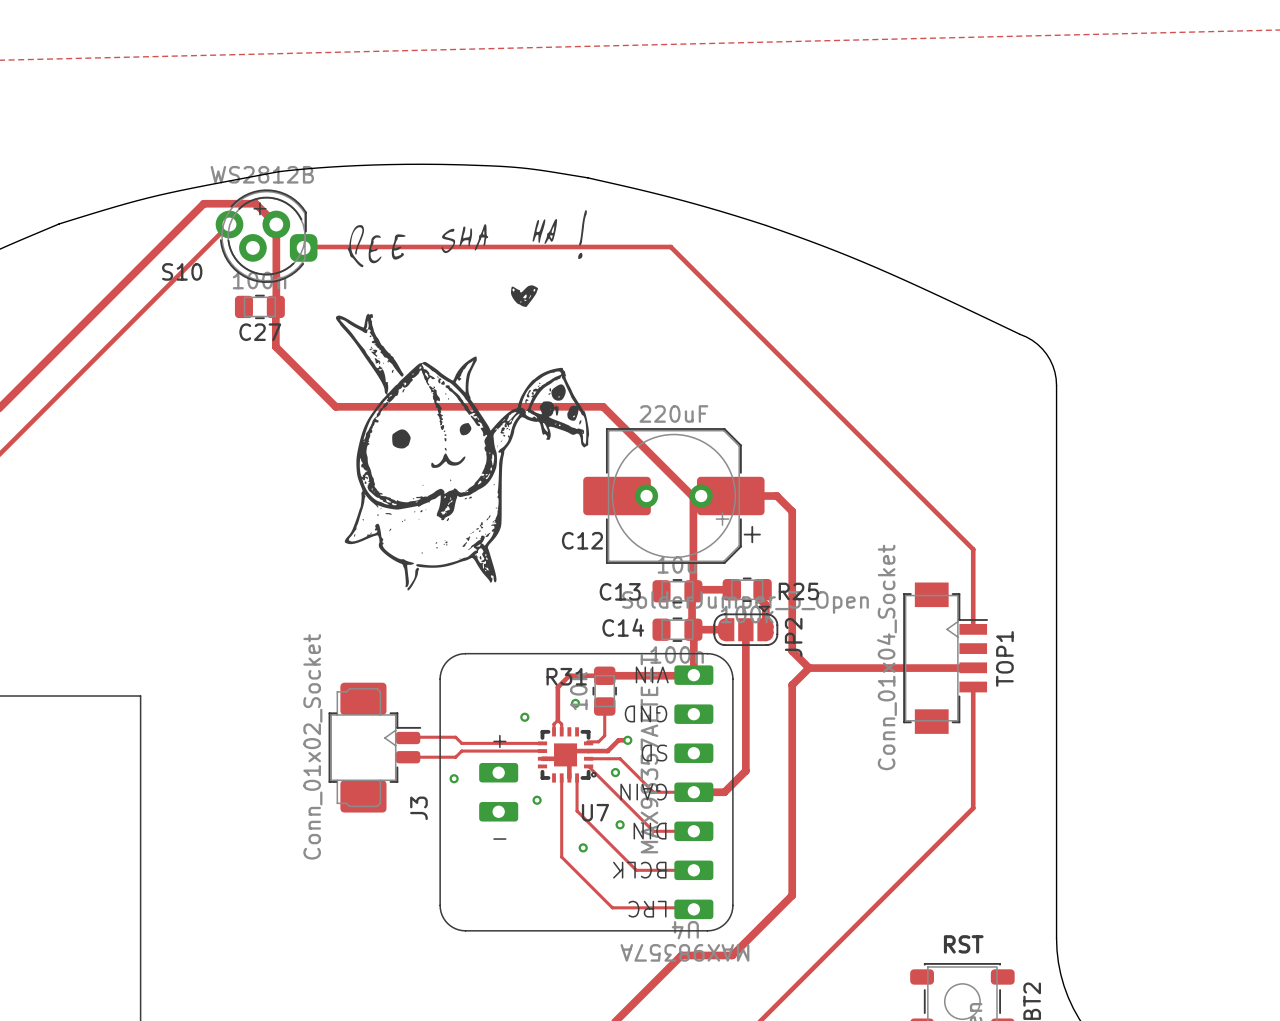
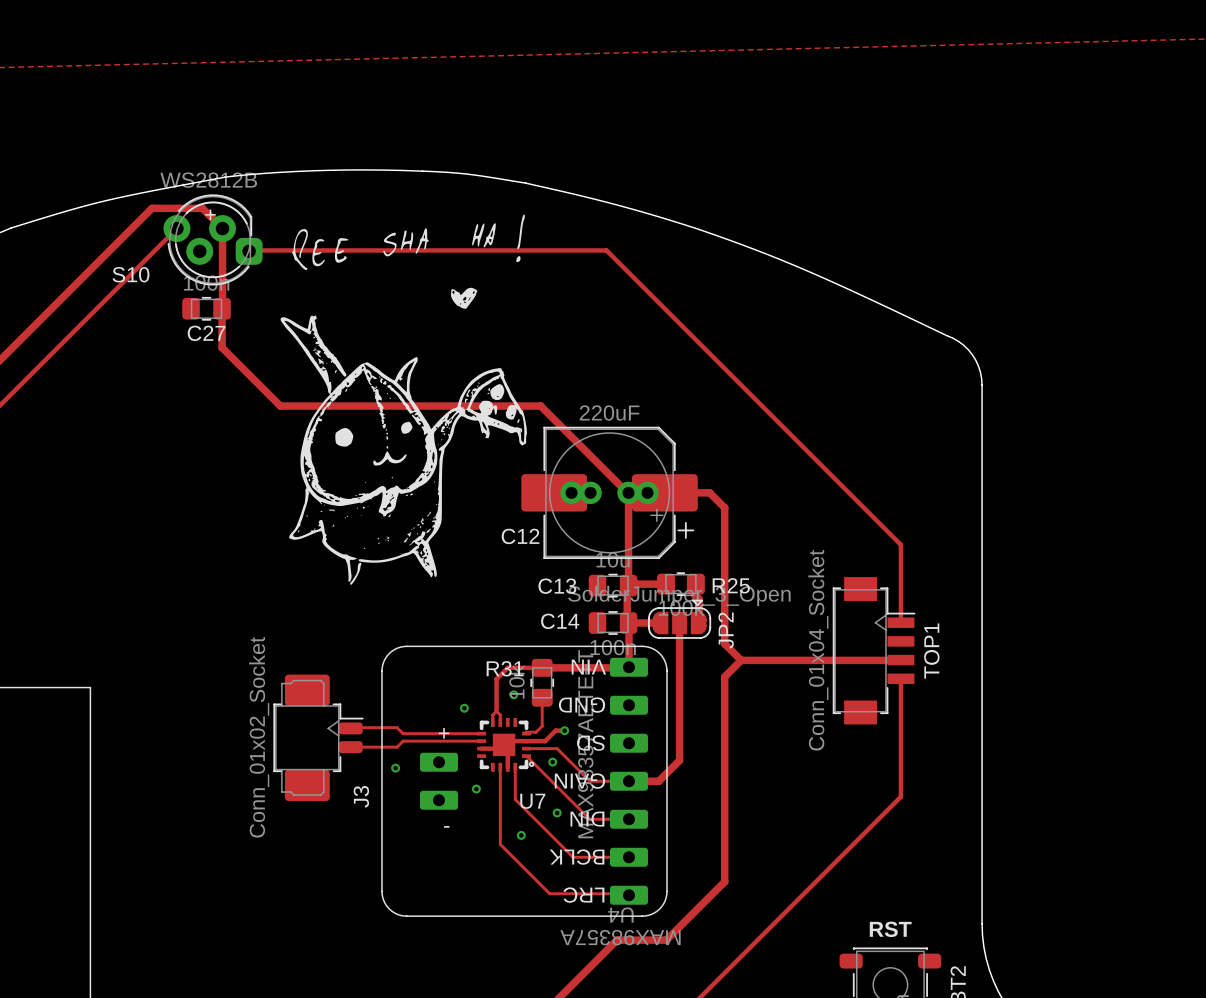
C12 footprint: [583, 428, 765, 564] -> [521, 426, 698, 559]

